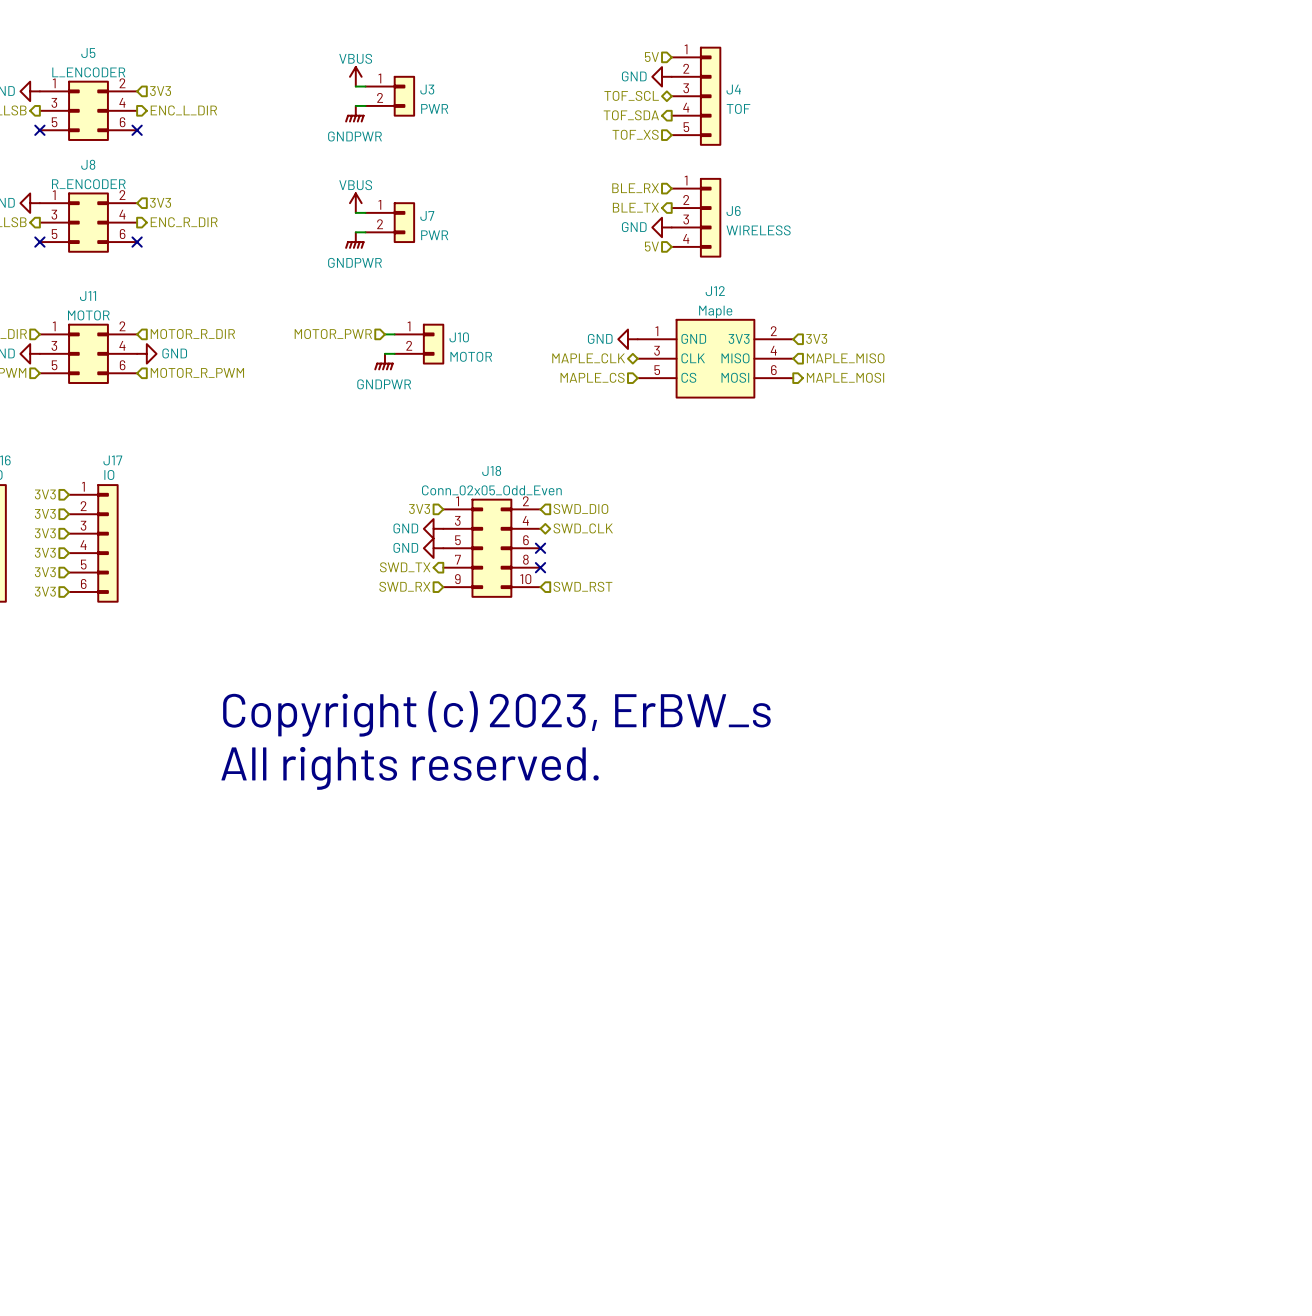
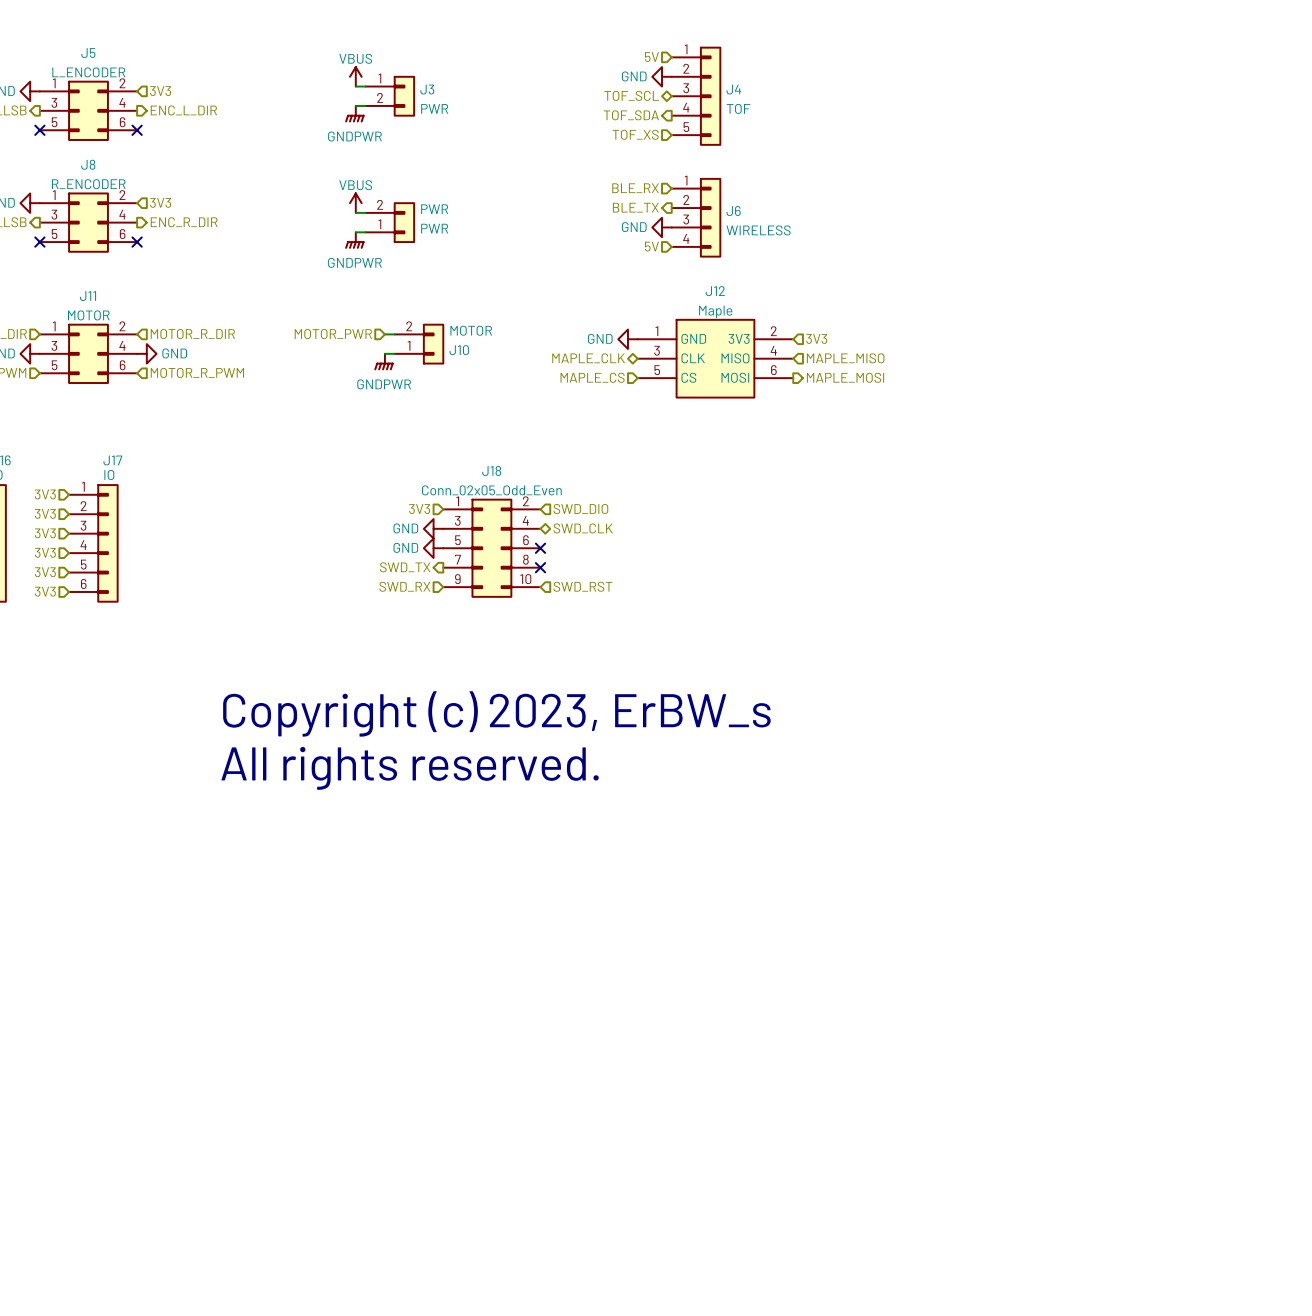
J7 name: J7 (427, 215) -> PWR (434, 228)
J7 flip: as is (404, 222) -> up-down (404, 222)
J10 flip: as is (433, 344) -> up-down (433, 344)

